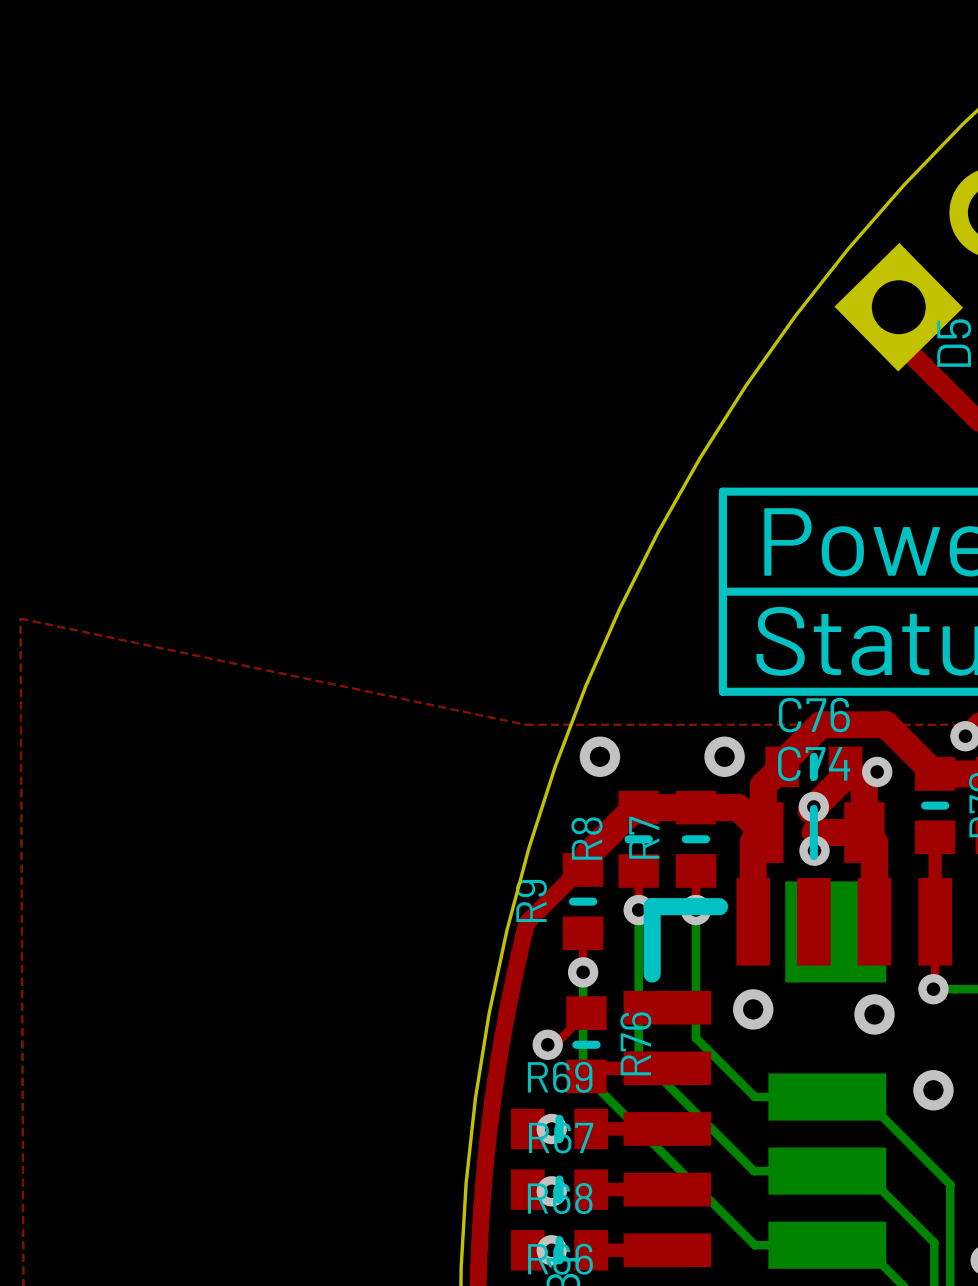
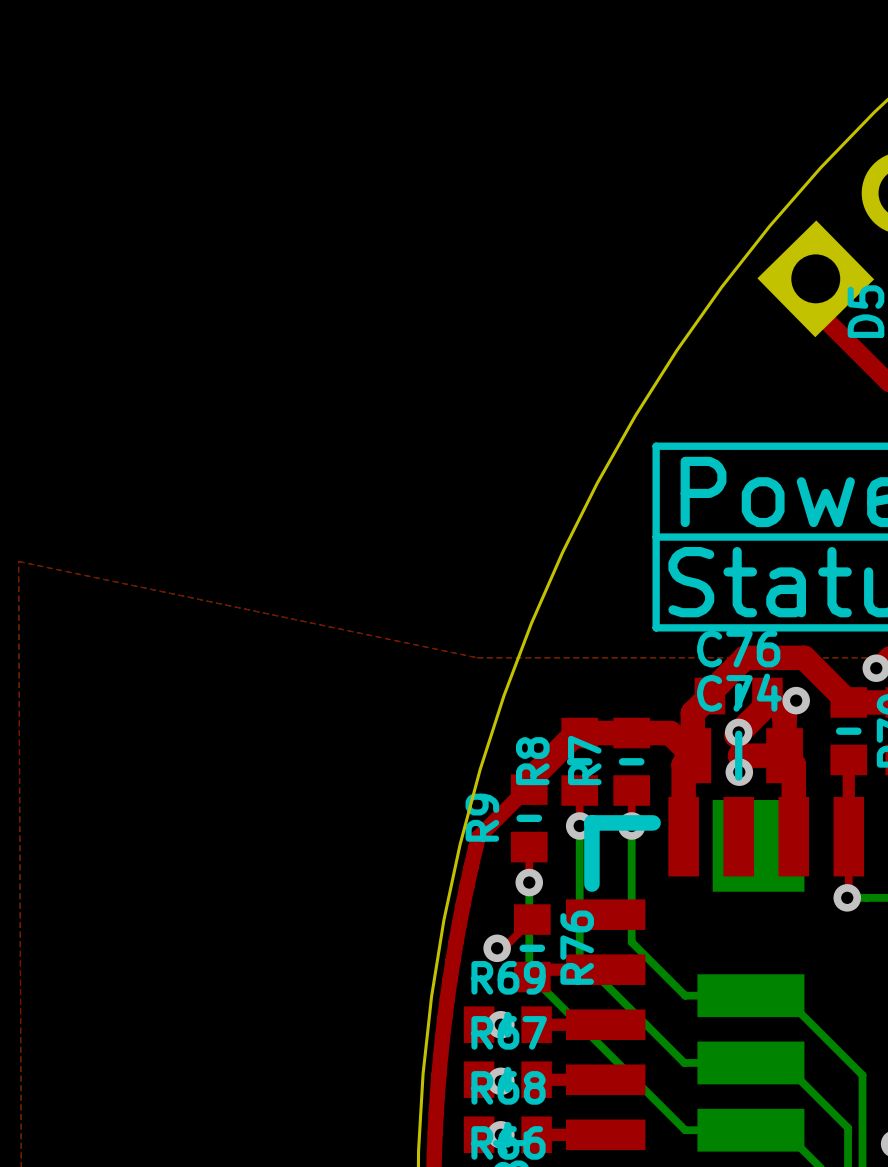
via: (599, 756) -> none
via: (724, 756) -> none
via: (753, 1009) -> none
via: (874, 1014) -> none
via: (933, 1090) -> none

